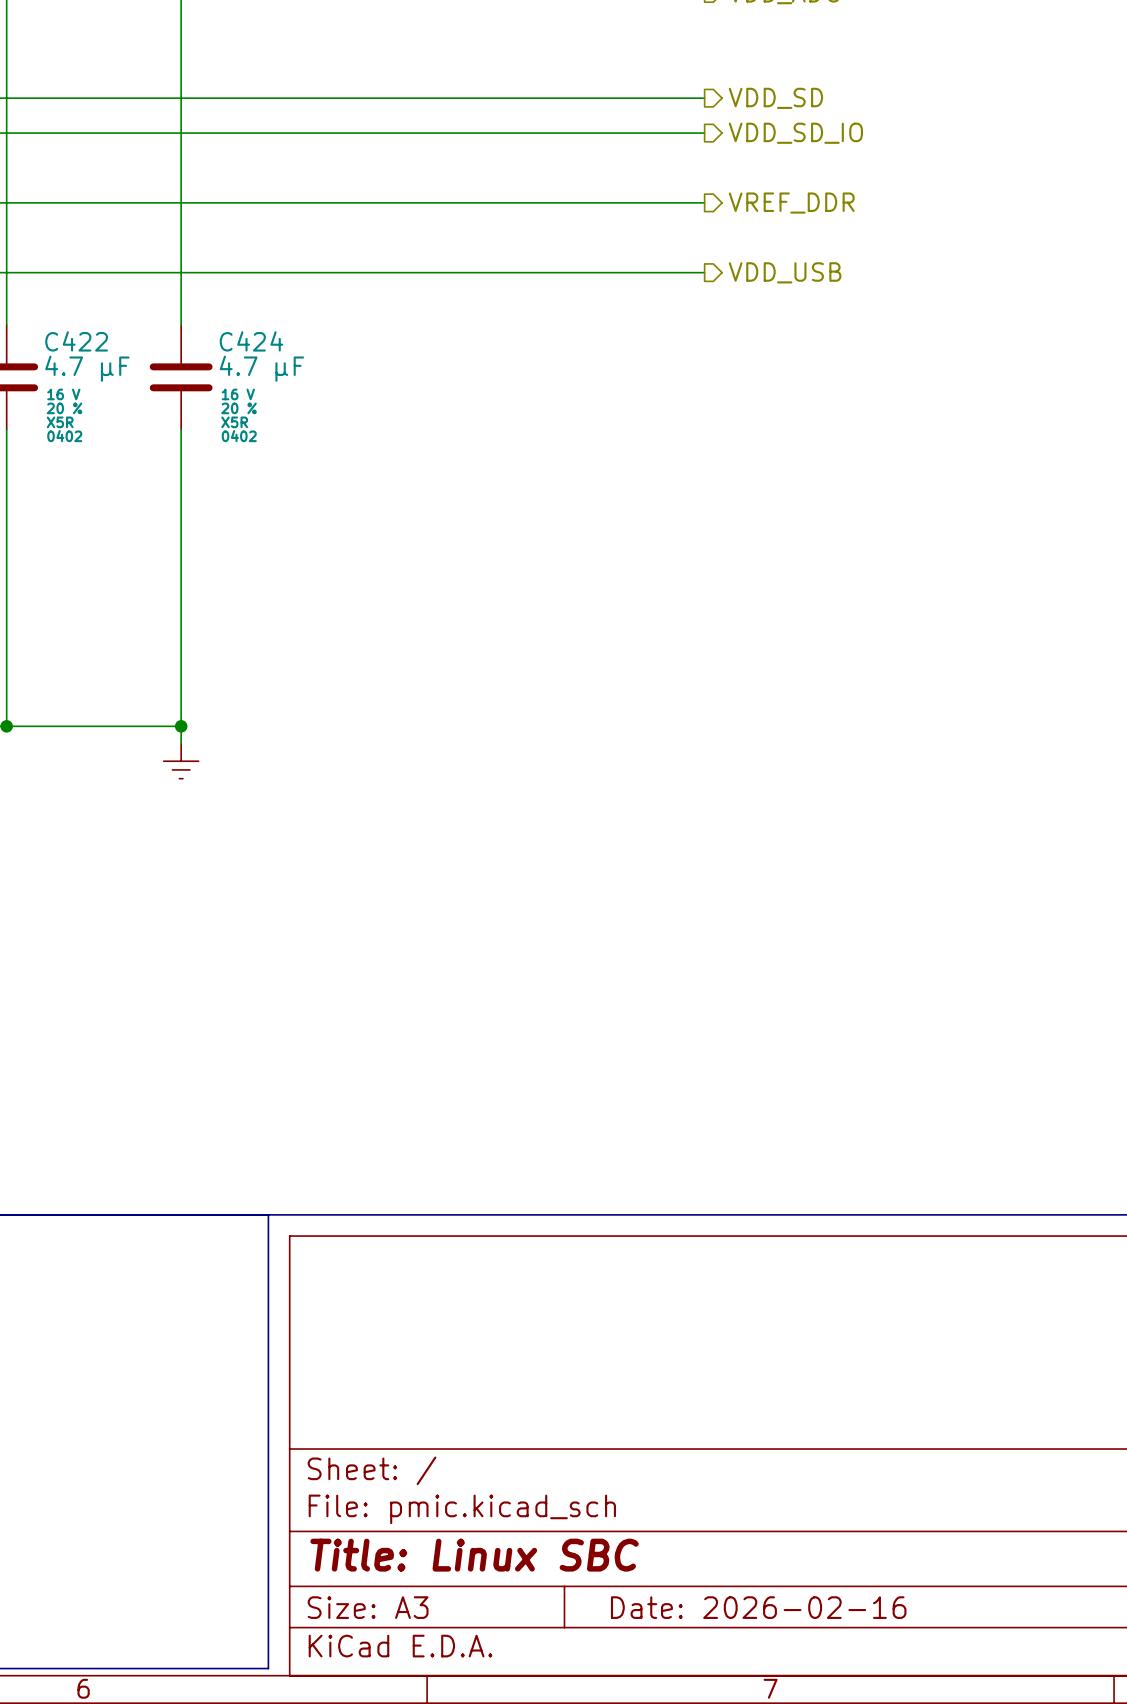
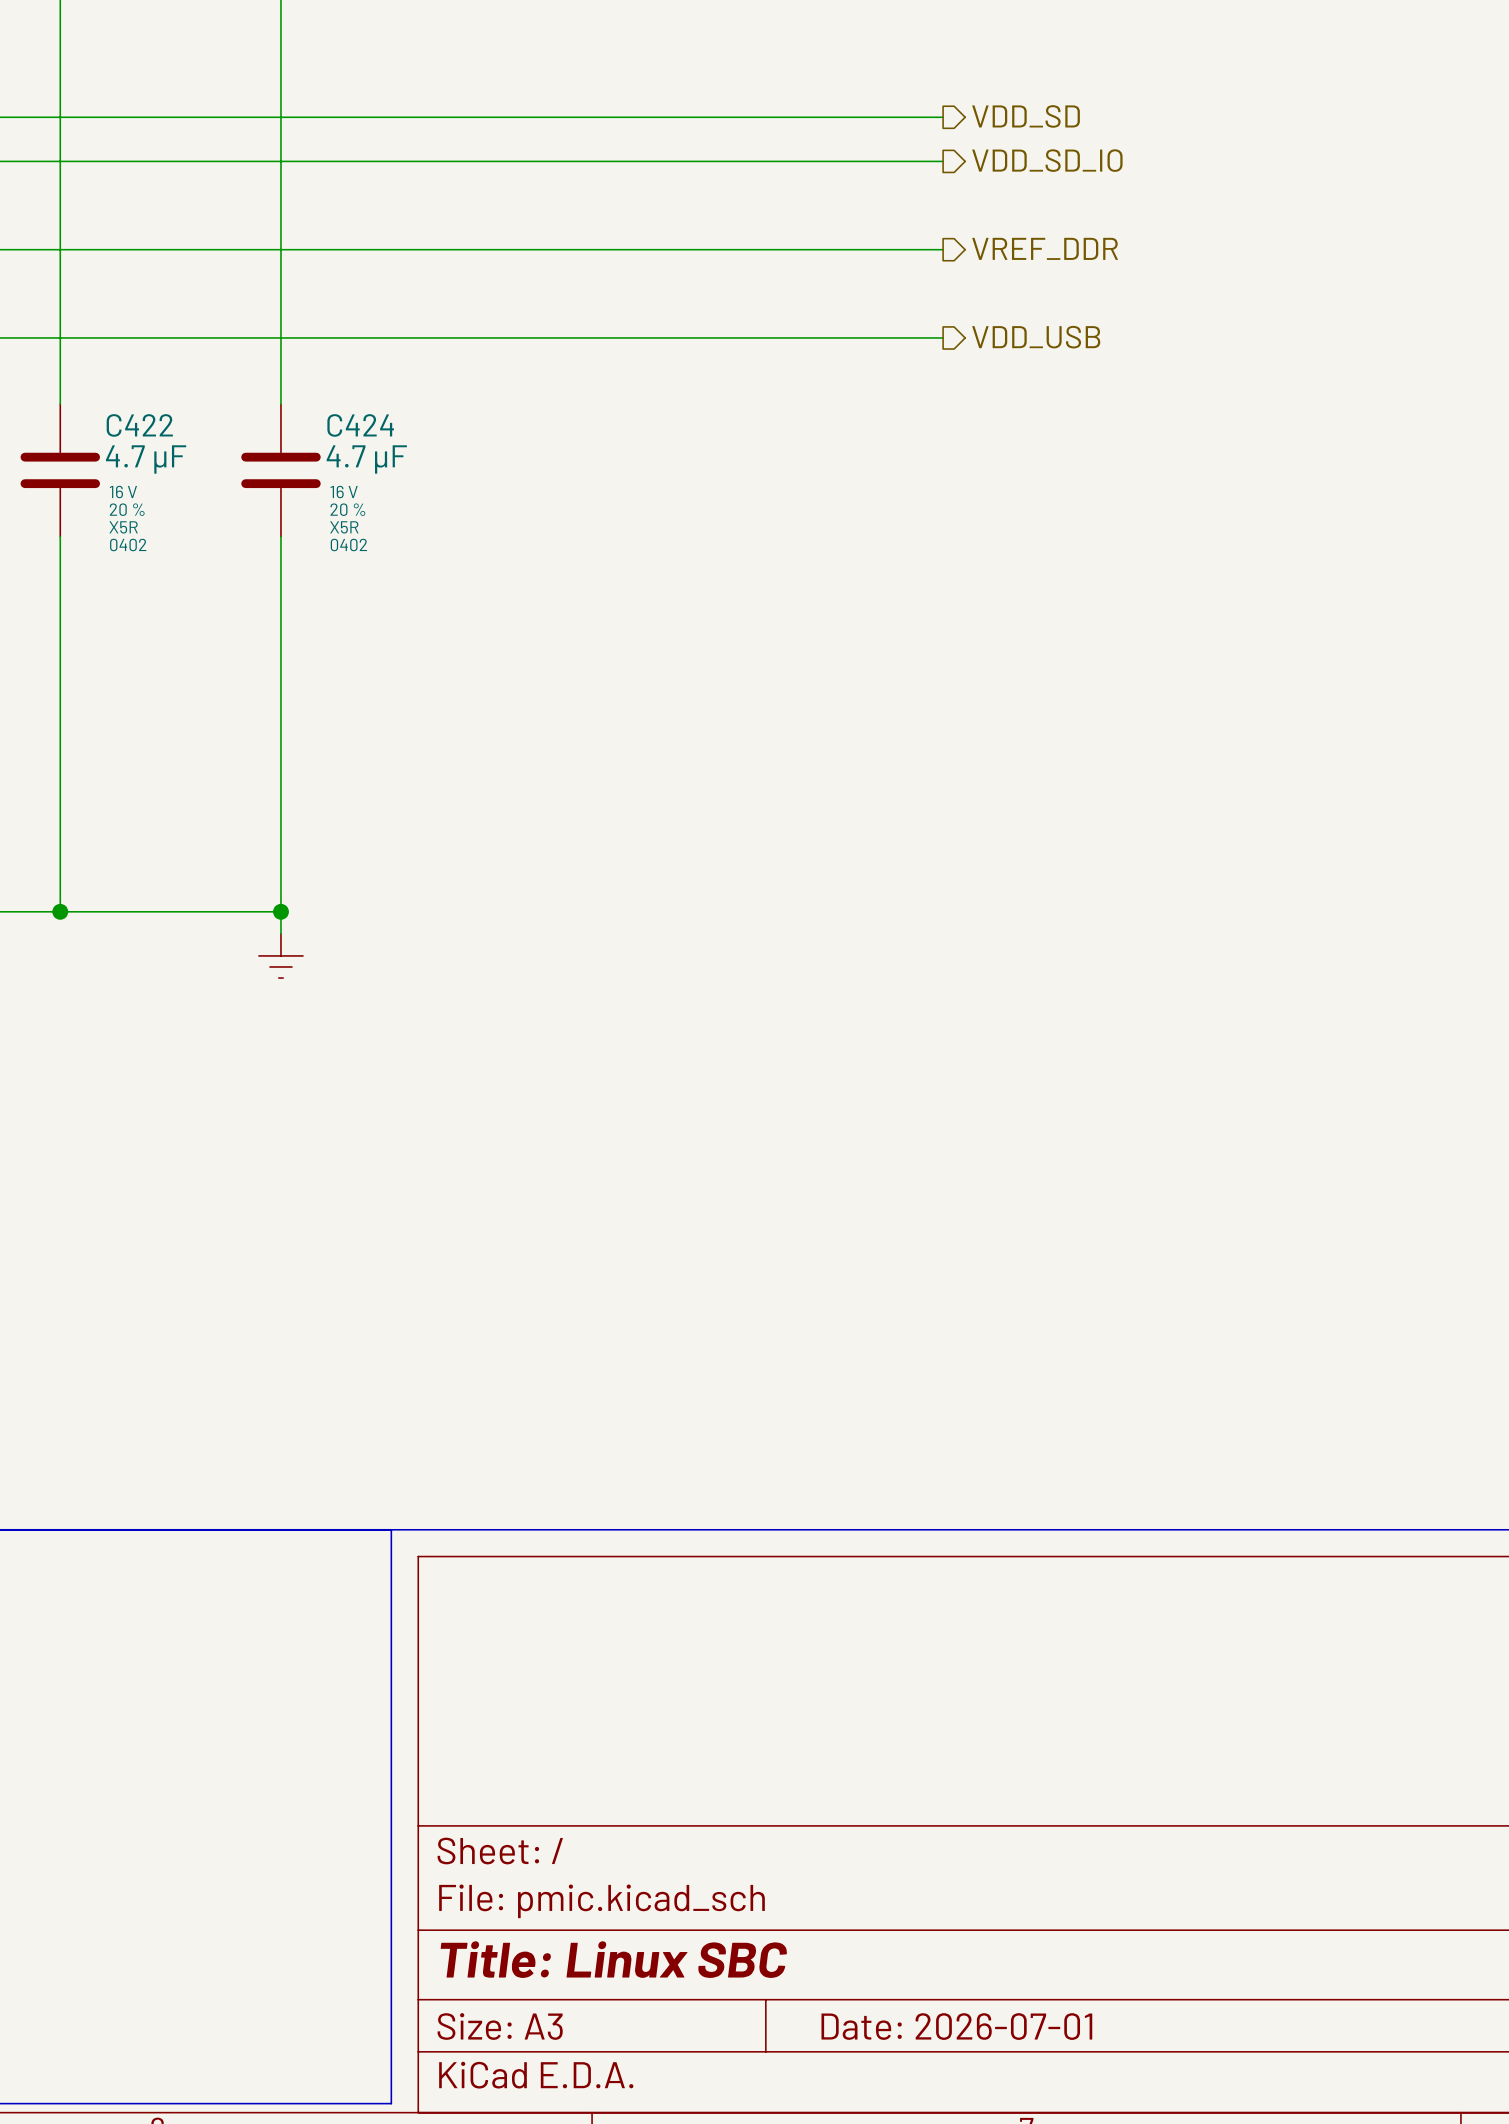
title block: Date: 2026-02-16 (758, 1607) -> Date: 2026-07-01 (956, 2026)

